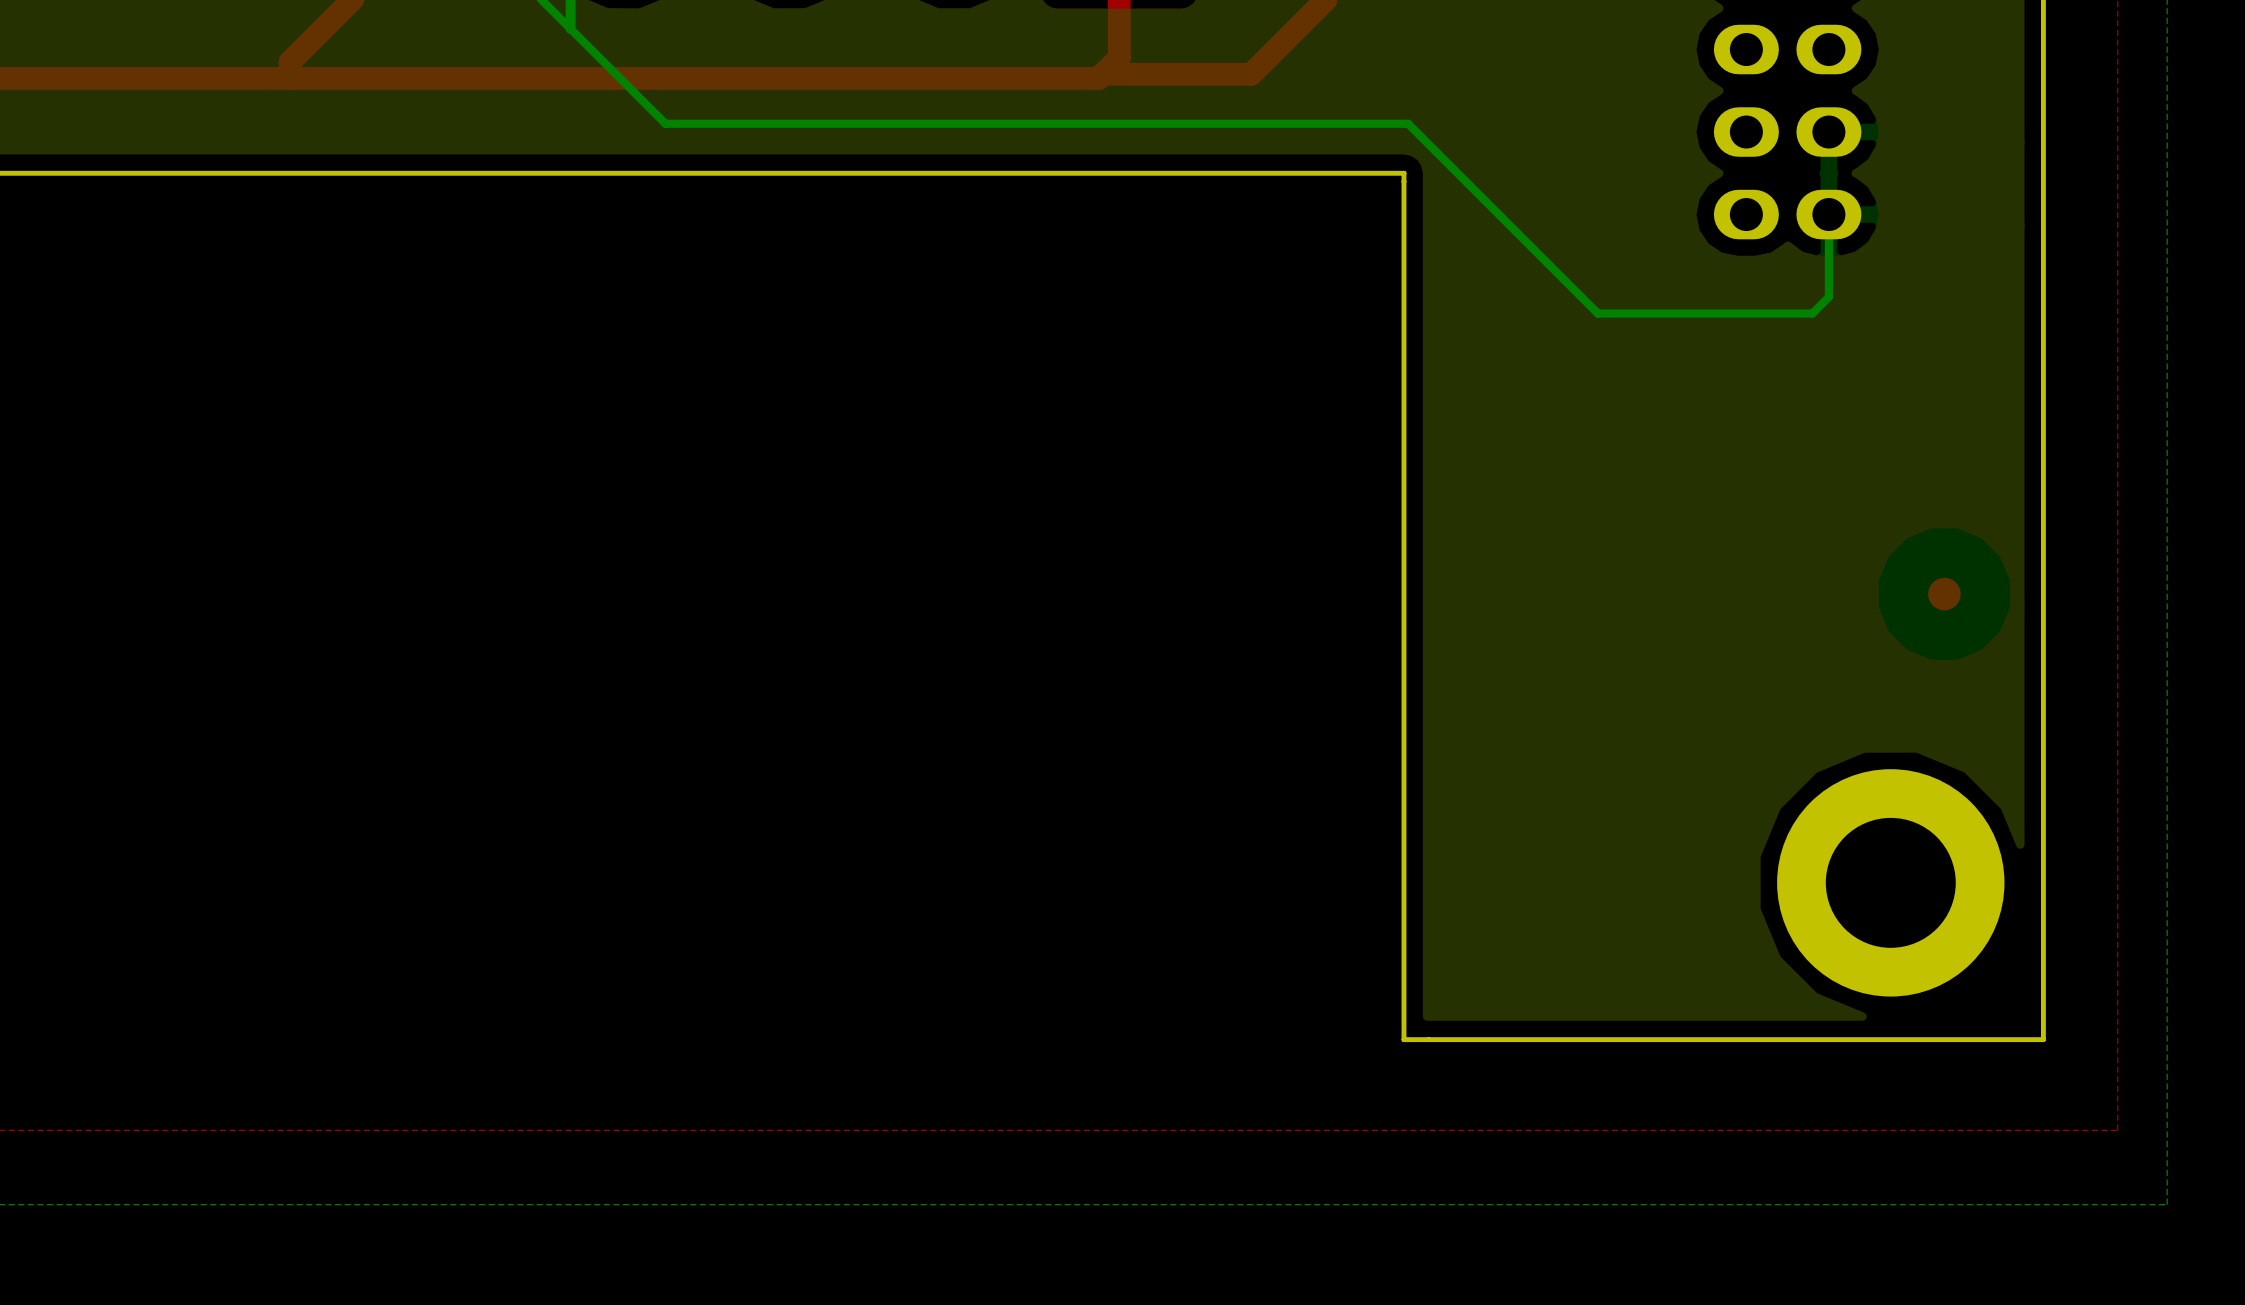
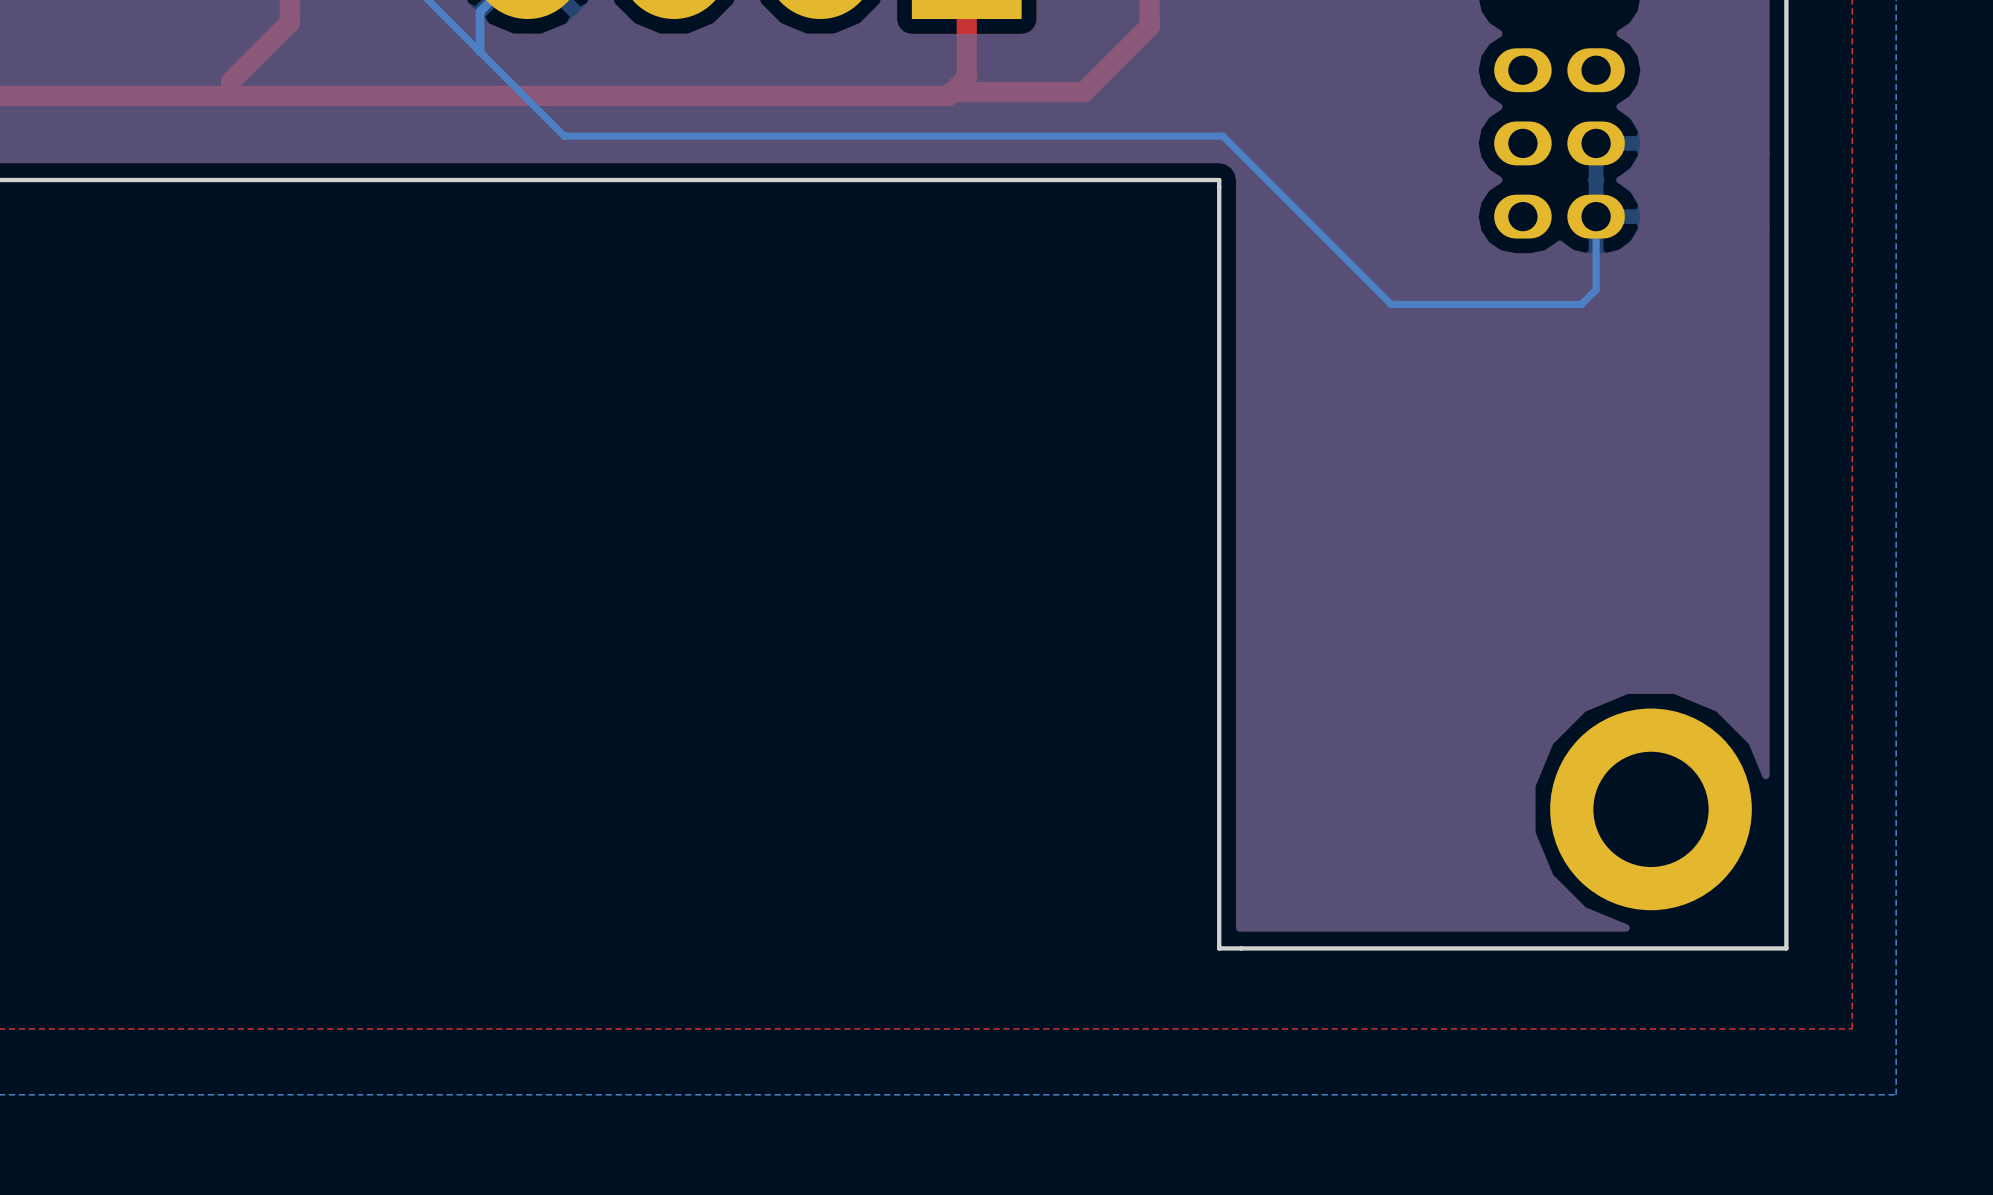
part: (1944, 594) -> none

